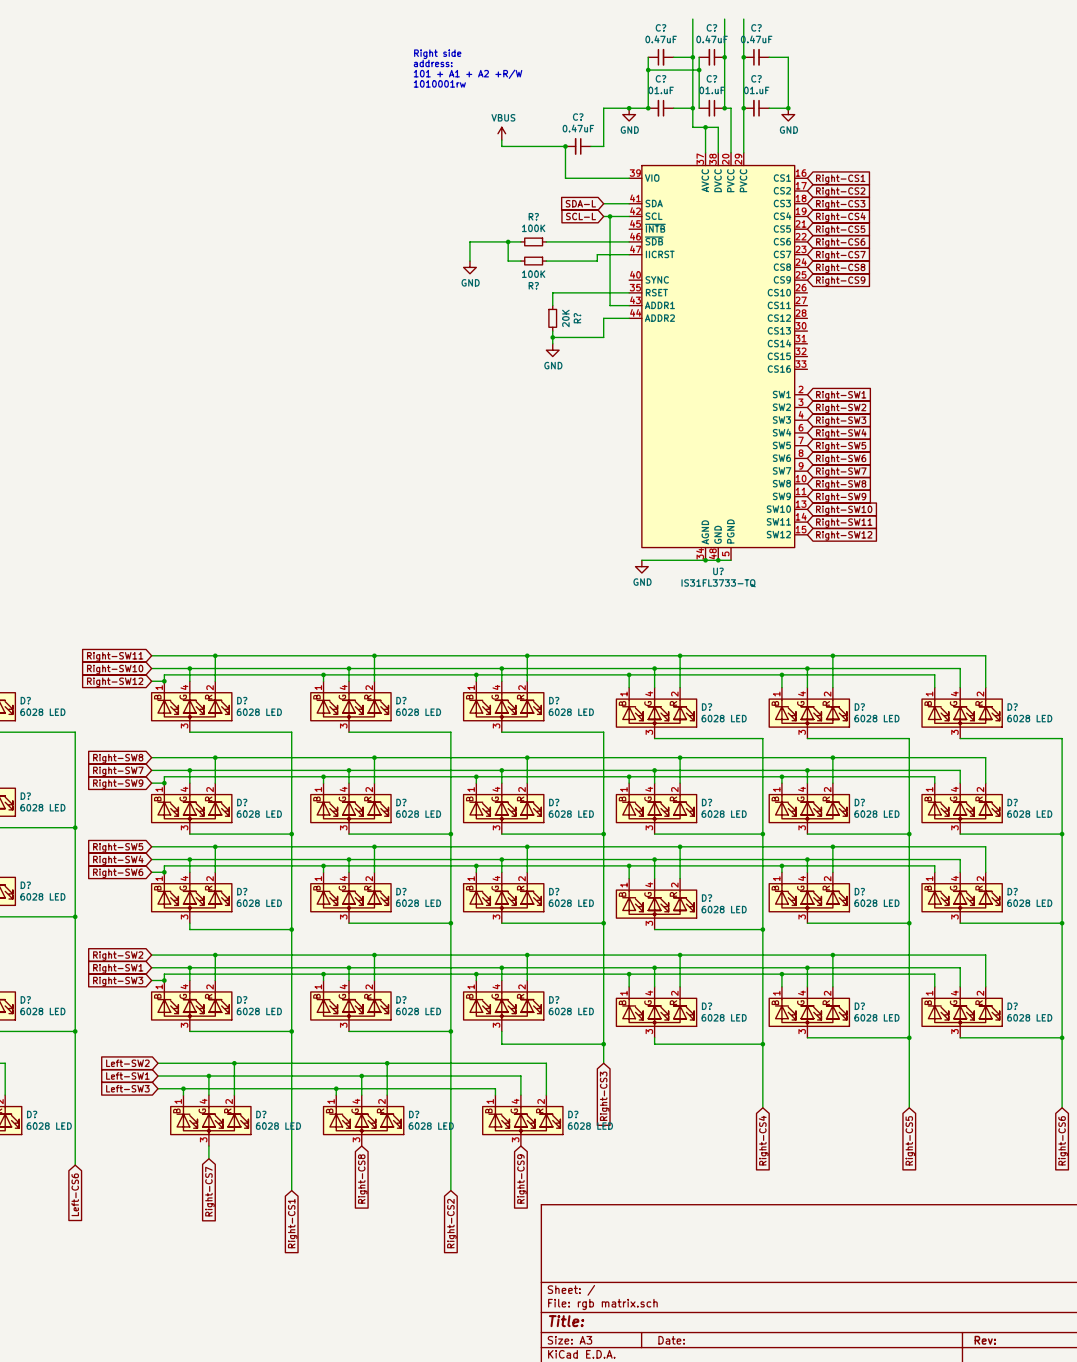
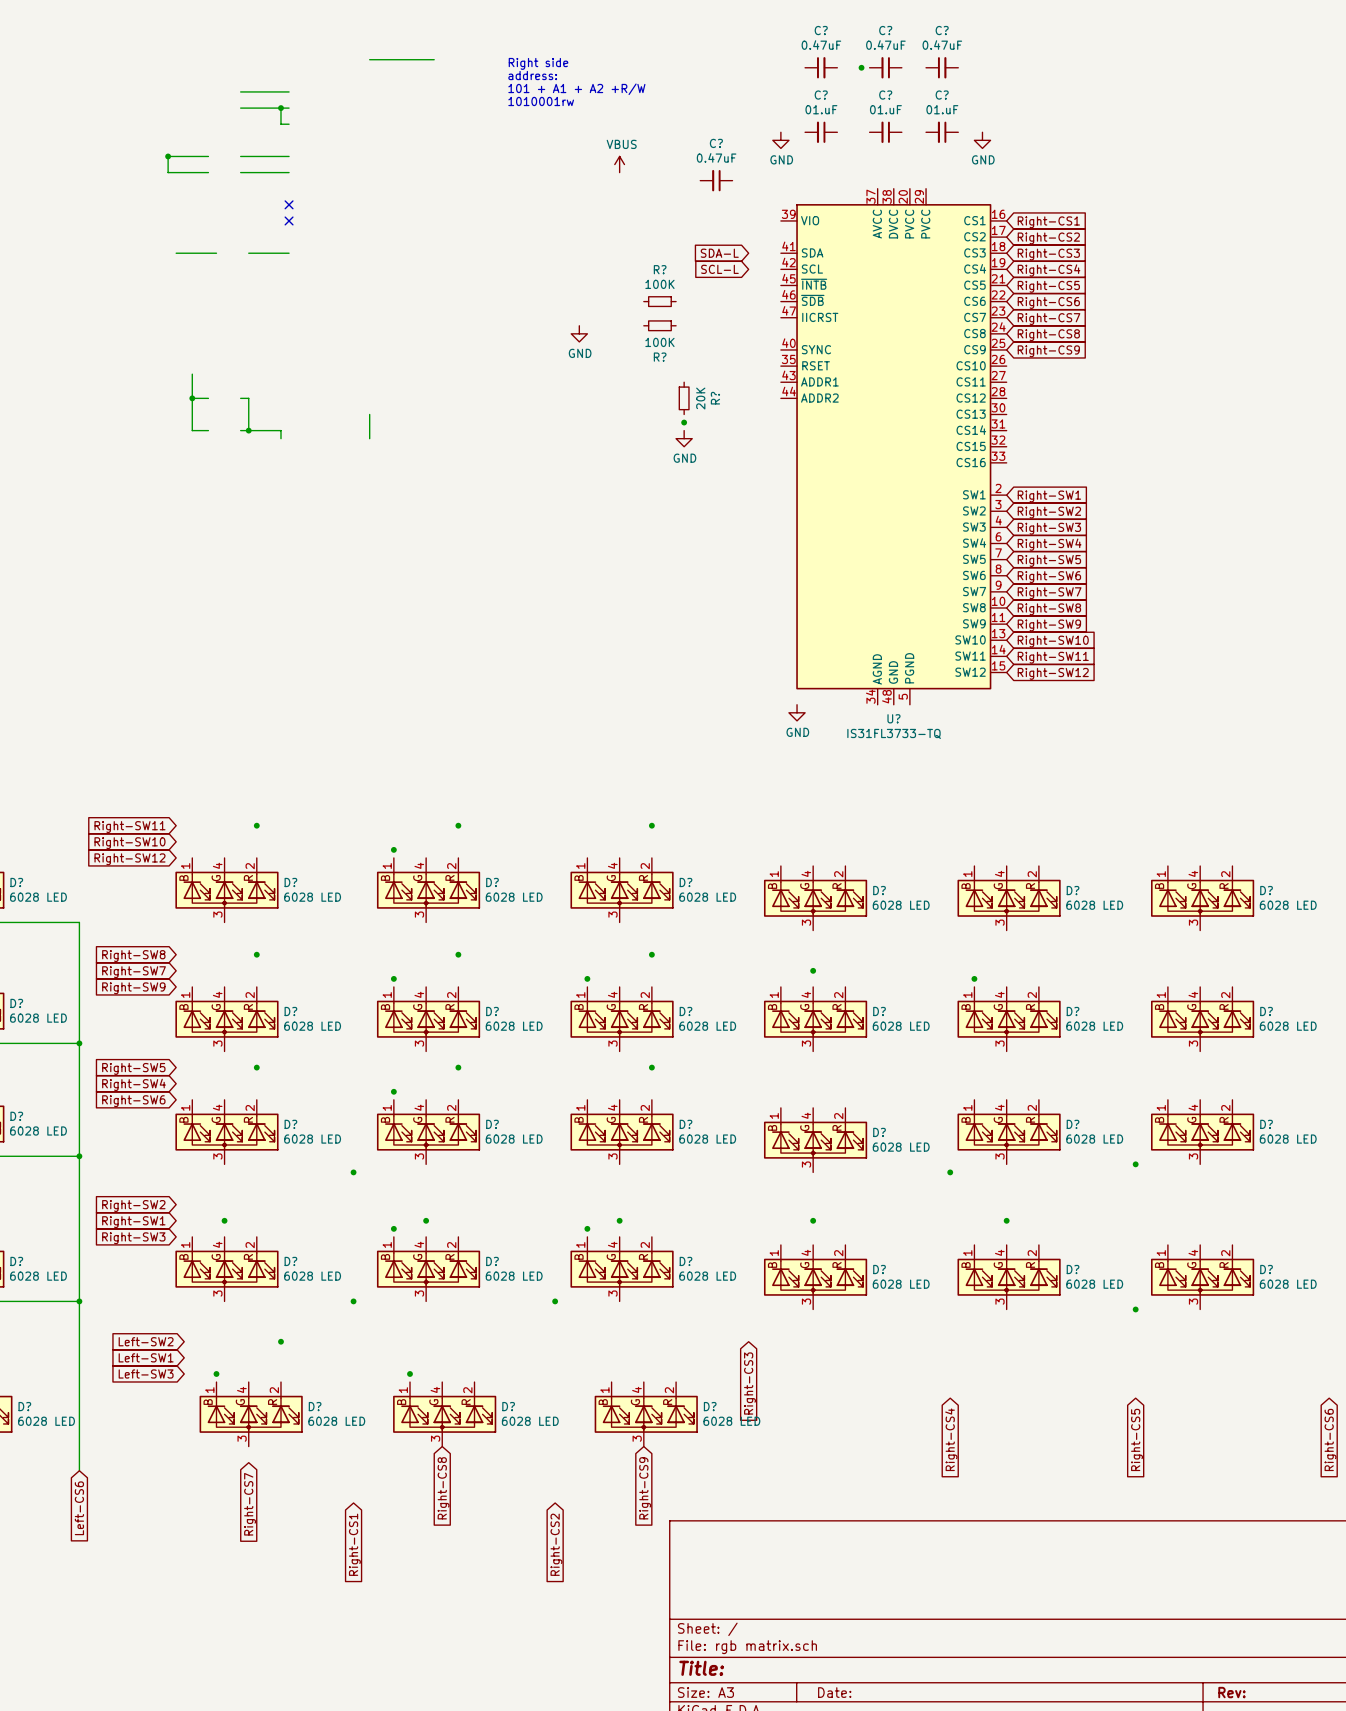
wire: (692, 19) (692, 127) (718, 127) (718, 152) -> none
wire: (724, 19) (724, 108) (731, 108) (731, 152) -> none
wire: (743, 19) (743, 152) -> none
wire: none -> (369, 59) (434, 59)
wire: (648, 57) (648, 108) (603, 108) (603, 146) (590, 146) -> none
wire: (673, 57) (692, 57) -> none
wire: (699, 57) (699, 108) -> none
junction: (724, 57) -> none
junction: (743, 57) -> none
wire: (769, 57) (788, 57) (788, 108) (769, 108) -> none
wire: (648, 70) (699, 70) -> none
junction: (648, 70) -> none
junction: (699, 70) -> none
wire: none -> (240, 91) (289, 91)
wire: none -> (240, 108) (289, 108)
wire: none -> (280, 108) (280, 124) (289, 124)
junction: none -> (280, 108)
junction: (629, 108) -> none
junction: (648, 108) -> none
wire: (673, 108) (692, 108) -> none
junction: (692, 108) -> none
junction: (724, 108) -> none
junction: (743, 108) -> none
junction: (788, 108) -> none
junction: none -> (168, 156)
wire: none -> (208, 156) (168, 156) (168, 172) (208, 172)
wire: none -> (240, 156) (289, 156)
wire: (705, 127) (705, 152) -> none
junction: (705, 127) -> none
wire: none -> (240, 172) (289, 172)
wire: (501, 140) (501, 146) (565, 146) (565, 178) (629, 178) -> none
junction: (565, 146) -> none
no-connect mark: none -> (289, 204)
no-connect mark: none -> (289, 220)
wire: none -> (176, 253) (216, 253)
wire: none -> (248, 253) (289, 253)
wire: (603, 203) (629, 203) -> none
wire: (603, 216) (629, 216) -> none
wire: (610, 216) (610, 305) (629, 305) -> none
junction: (610, 216) -> none
wire: (508, 241) (508, 261) (520, 261) -> none
junction: (508, 241) -> none
wire: (520, 241) (469, 241) (469, 261) -> none
wire: (546, 241) (629, 241) -> none
wire: (629, 254) (597, 254) (597, 261) (546, 261) -> none
wire: (629, 292) (552, 292) (552, 305) -> none
wire: none -> (192, 374) (192, 430) (208, 430)
wire: none -> (192, 398) (208, 398)
junction: none -> (192, 398)
wire: none -> (240, 398) (248, 398) (248, 430)
wire: (629, 318) (603, 318) (603, 337) (552, 337) -> none
wire: none -> (369, 414) (369, 438)
wire: (552, 331) (552, 343) -> none
wire: none -> (240, 430) (280, 430) (280, 438)
junction: none -> (248, 430)
wire: (641, 560) (731, 560) -> none
junction: (705, 560) -> none
junction: (718, 560) -> none
wire: (151, 655) (985, 655) (985, 687) -> none
wire: (215, 655) (215, 681) -> none
wire: (374, 655) (374, 681) -> none
wire: (527, 655) (527, 681) -> none
wire: (680, 655) (680, 687) -> none
junction: (680, 655) -> none
wire: (832, 655) (832, 687) -> none
junction: (832, 655) -> none
wire: (151, 668) (960, 668) (960, 687) -> none
wire: (189, 668) (189, 681) -> none
junction: (189, 668) -> none
wire: (349, 668) (349, 681) -> none
junction: (349, 668) -> none
wire: (501, 668) (501, 681) -> none
junction: (501, 668) -> none
wire: (654, 668) (654, 687) -> none
junction: (654, 668) -> none
wire: (807, 668) (807, 687) -> none
junction: (807, 668) -> none
wire: (323, 674) (323, 681) -> none
wire: (476, 674) (476, 681) -> none
junction: (476, 674) -> none
wire: (629, 674) (629, 687) -> none
junction: (629, 674) -> none
wire: (781, 674) (781, 687) -> none
junction: (781, 674) -> none
wire: (151, 681) (164, 681) (164, 674) (934, 674) (934, 687) -> none
junction: (164, 681) -> none
wire: (189, 732) (291, 732) (291, 1190) -> none
wire: (349, 732) (450, 732) (450, 1190) -> none
wire: (501, 732) (603, 732) (603, 1063) -> none
wire: (654, 738) (762, 738) (762, 1107) -> none
wire: (807, 738) (909, 738) (909, 1107) -> none
wire: (960, 738) (1062, 738) (1062, 1107) -> none
wire: (151, 757) (985, 757) (985, 783) -> none
wire: (215, 757) (215, 783) -> none
wire: (374, 757) (374, 783) -> none
wire: (527, 757) (527, 783) -> none
wire: (680, 757) (680, 783) -> none
junction: (680, 757) -> none
wire: (832, 757) (832, 783) -> none
junction: (832, 757) -> none
wire: (151, 770) (960, 770) (960, 783) -> none
wire: (189, 770) (189, 783) -> none
junction: (189, 770) -> none
wire: (349, 770) (349, 783) -> none
junction: (349, 770) -> none
wire: (501, 770) (501, 783) -> none
junction: (501, 770) -> none
wire: (654, 770) (654, 783) -> none
wire: (807, 770) (807, 783) -> none
junction: (807, 770) -> none
wire: (323, 776) (323, 783) -> none
wire: (476, 776) (476, 783) -> none
wire: (629, 776) (629, 783) -> none
junction: (629, 776) -> none
wire: (781, 776) (781, 783) -> none
wire: (151, 783) (164, 783) (164, 776) (934, 776) (934, 783) -> none
junction: (164, 783) -> none
wire: (189, 834) (291, 834) -> none
junction: (291, 834) -> none
wire: (349, 834) (450, 834) -> none
junction: (450, 834) -> none
wire: (501, 834) (603, 834) -> none
junction: (603, 834) -> none
wire: (654, 834) (762, 834) -> none
junction: (762, 834) -> none
wire: (807, 834) (909, 834) -> none
junction: (909, 834) -> none
wire: (960, 834) (1062, 834) -> none
junction: (1062, 834) -> none
wire: (151, 846) (985, 846) (985, 872) -> none
wire: (215, 846) (215, 872) -> none
wire: (374, 846) (374, 872) -> none
wire: (527, 846) (527, 872) -> none
wire: (680, 846) (680, 878) -> none
junction: (680, 846) -> none
wire: (832, 846) (832, 872) -> none
junction: (832, 846) -> none
wire: (151, 859) (960, 859) (960, 872) -> none
wire: (189, 859) (189, 872) -> none
junction: (189, 859) -> none
wire: (349, 859) (349, 872) -> none
junction: (349, 859) -> none
wire: (501, 859) (501, 872) -> none
junction: (501, 859) -> none
wire: (654, 859) (654, 878) -> none
junction: (654, 859) -> none
wire: (807, 859) (807, 872) -> none
junction: (807, 859) -> none
wire: (323, 865) (323, 872) -> none
wire: (476, 865) (476, 872) -> none
junction: (476, 865) -> none
wire: (629, 865) (629, 878) -> none
junction: (629, 865) -> none
wire: (781, 865) (781, 872) -> none
junction: (781, 865) -> none
wire: (151, 872) (164, 872) (164, 865) (934, 865) (934, 872) -> none
junction: (164, 872) -> none
wire: (189, 923) (189, 929) (291, 929) -> none
wire: (349, 923) (450, 923) -> none
junction: (450, 923) -> none
wire: (501, 923) (603, 923) -> none
junction: (603, 923) -> none
wire: (807, 923) (909, 923) -> none
wire: (960, 923) (1062, 923) -> none
junction: (1062, 923) -> none
wire: (654, 929) (762, 929) -> none
wire: (151, 955) (985, 955) (985, 986) -> none
wire: (215, 955) (215, 980) -> none
junction: (215, 955) -> none
wire: (374, 955) (374, 980) -> none
junction: (374, 955) -> none
wire: (527, 955) (527, 980) -> none
junction: (527, 955) -> none
wire: (680, 955) (680, 986) -> none
junction: (680, 955) -> none
wire: (832, 955) (832, 986) -> none
junction: (832, 955) -> none
wire: (151, 967) (960, 967) (960, 986) -> none
wire: (189, 967) (189, 980) -> none
wire: (349, 967) (349, 980) -> none
wire: (501, 967) (501, 980) -> none
wire: (654, 967) (654, 986) -> none
wire: (807, 967) (807, 986) -> none
wire: (323, 974) (323, 980) -> none
wire: (476, 974) (476, 980) -> none
wire: (629, 974) (629, 986) -> none
junction: (629, 974) -> none
wire: (781, 974) (781, 986) -> none
junction: (781, 974) -> none
wire: (151, 980) (164, 980) (164, 974) (934, 974) (934, 986) -> none
junction: (164, 980) -> none
wire: (189, 1031) (291, 1031) -> none
wire: (349, 1031) (450, 1031) -> none
wire: (501, 1031) (501, 1044) (603, 1044) -> none
wire: (654, 1037) (654, 1044) (762, 1044) -> none
wire: (807, 1037) (909, 1037) -> none
wire: (960, 1037) (1062, 1037) -> none
junction: (1062, 1037) -> none
junction: (603, 1044) -> none
junction: (762, 1044) -> none
wire: (157, 1063) (546, 1063) (546, 1095) -> none
wire: (234, 1063) (234, 1095) -> none
wire: (387, 1063) (387, 1095) -> none
junction: (387, 1063) -> none
wire: (157, 1076) (520, 1076) (520, 1095) -> none
wire: (208, 1076) (208, 1095) -> none
junction: (208, 1076) -> none
wire: (361, 1076) (361, 1095) -> none
junction: (361, 1076) -> none
wire: (157, 1088) (495, 1088) (495, 1095) -> none
wire: (183, 1088) (183, 1095) -> none
wire: (336, 1088) (336, 1095) -> none
wire: (208, 1146) (208, 1158) -> none

